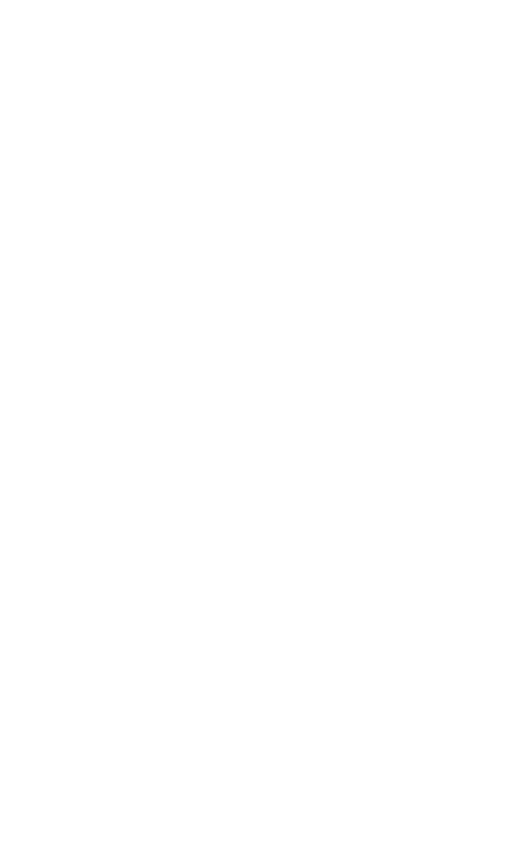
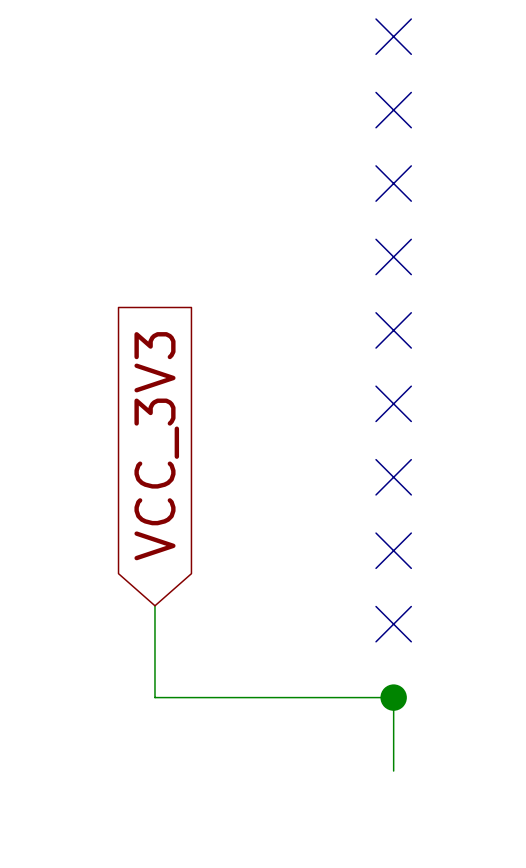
no-connect mark: none -> (393, 36)
no-connect mark: none -> (393, 110)
no-connect mark: none -> (393, 183)
no-connect mark: none -> (393, 256)
no-connect mark: none -> (393, 330)
no-connect mark: none -> (393, 403)
global label: none -> VCC_3V3 (156, 446)
no-connect mark: none -> (393, 477)
no-connect mark: none -> (393, 550)
wire: none -> (154, 605) (154, 697) (393, 697) (393, 771)
no-connect mark: none -> (393, 624)
junction: none -> (393, 697)

